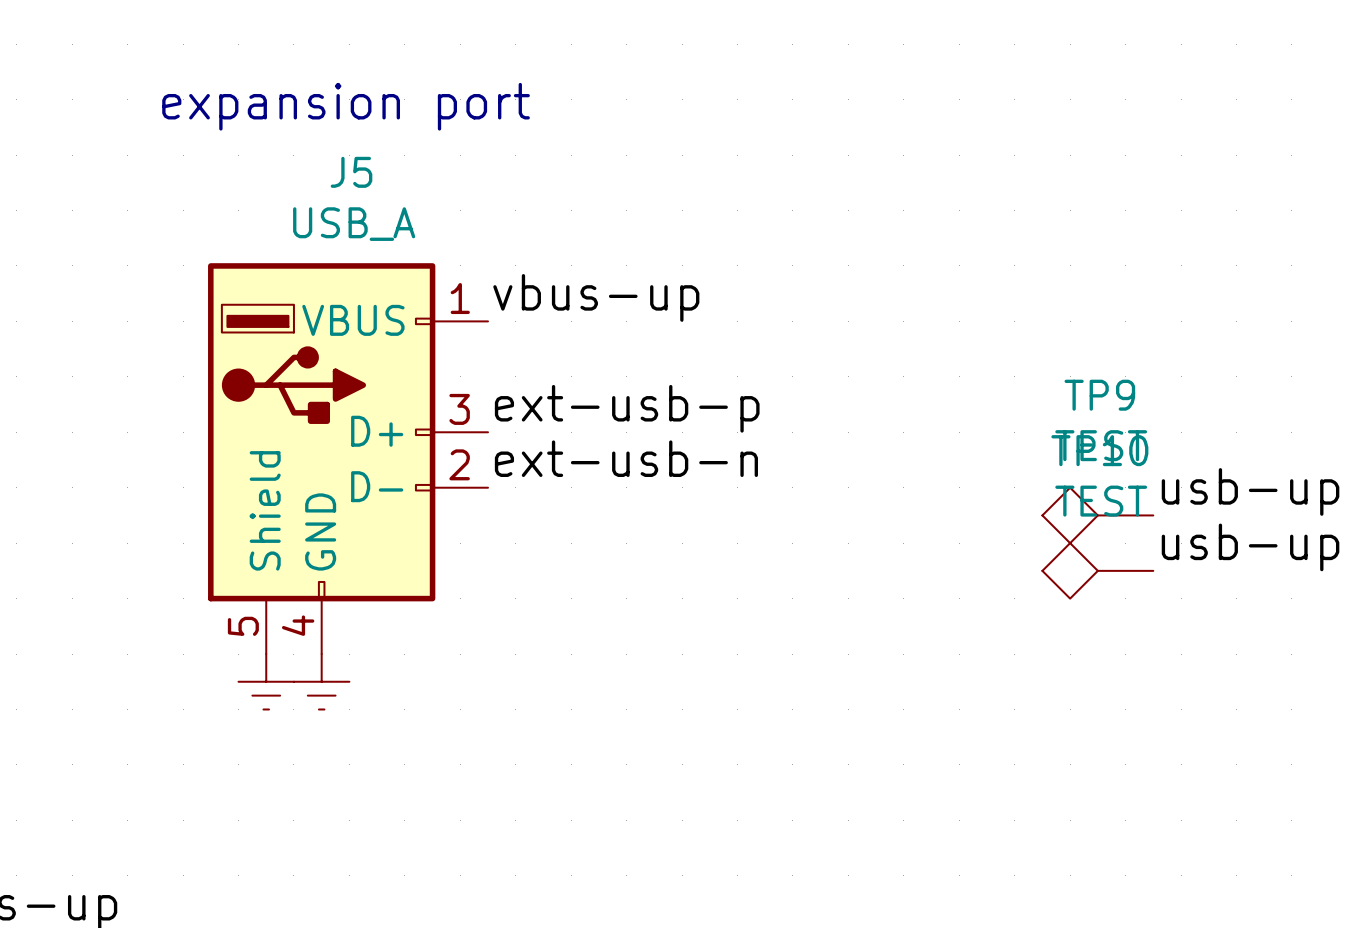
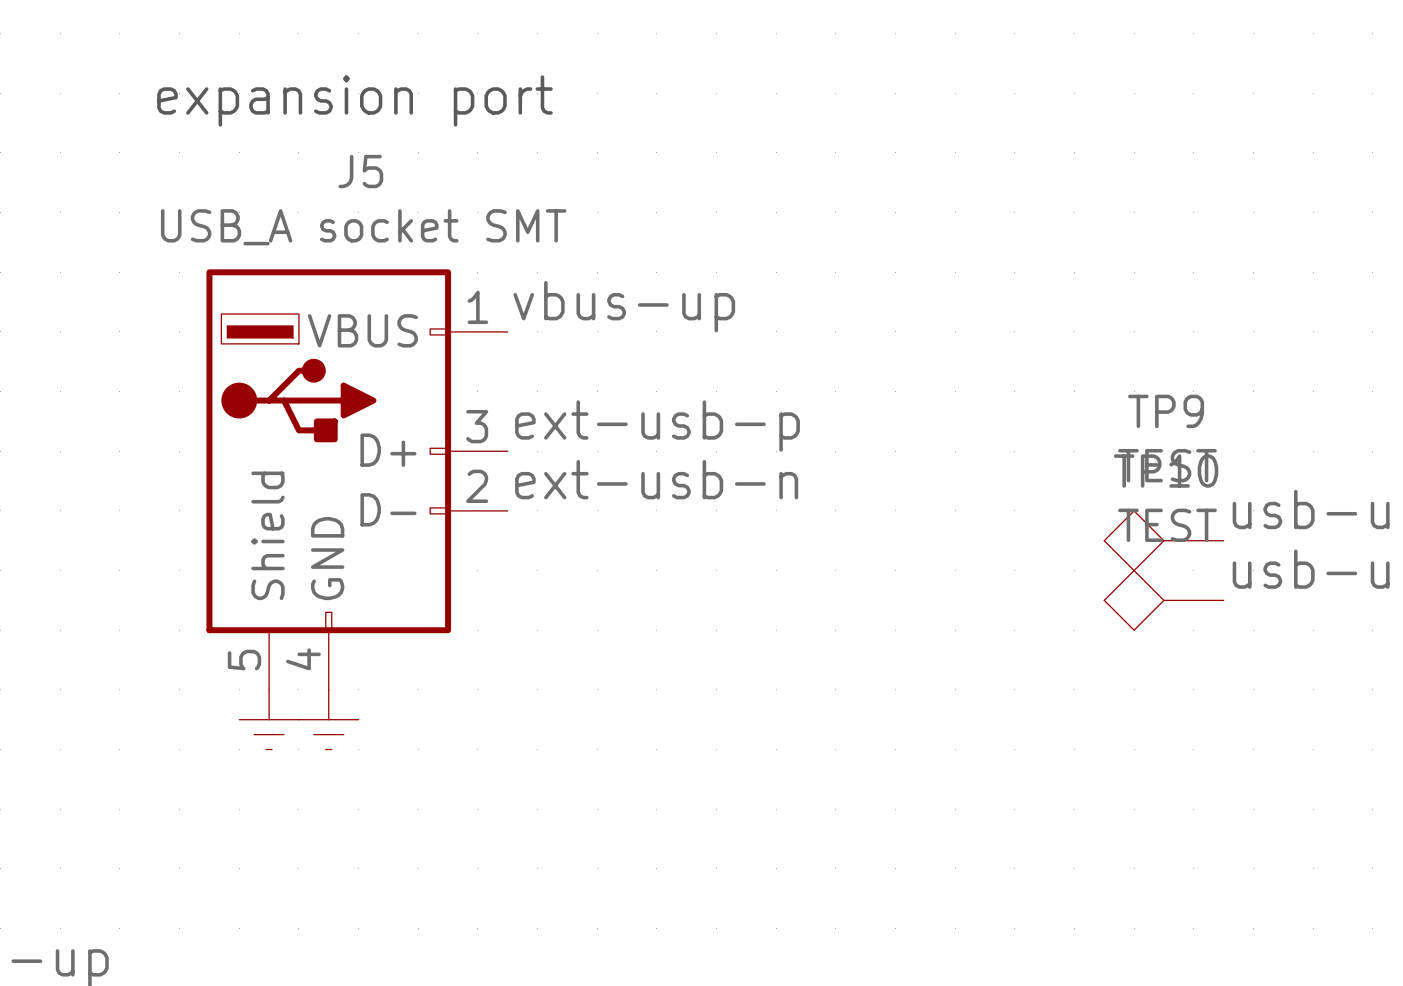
J5 value: USB_A (354, 224) -> USB_A socket SMT (363, 227)

